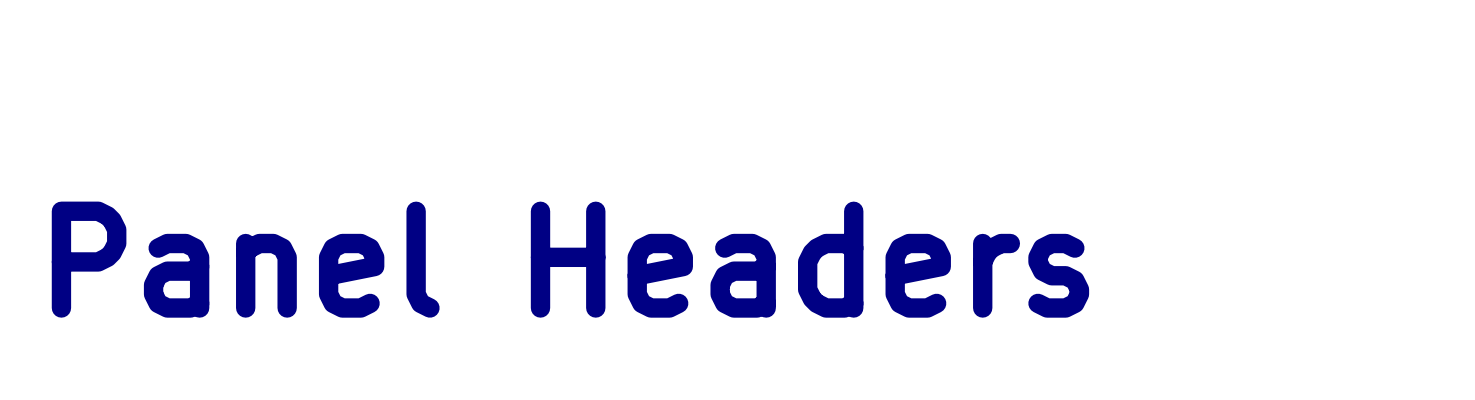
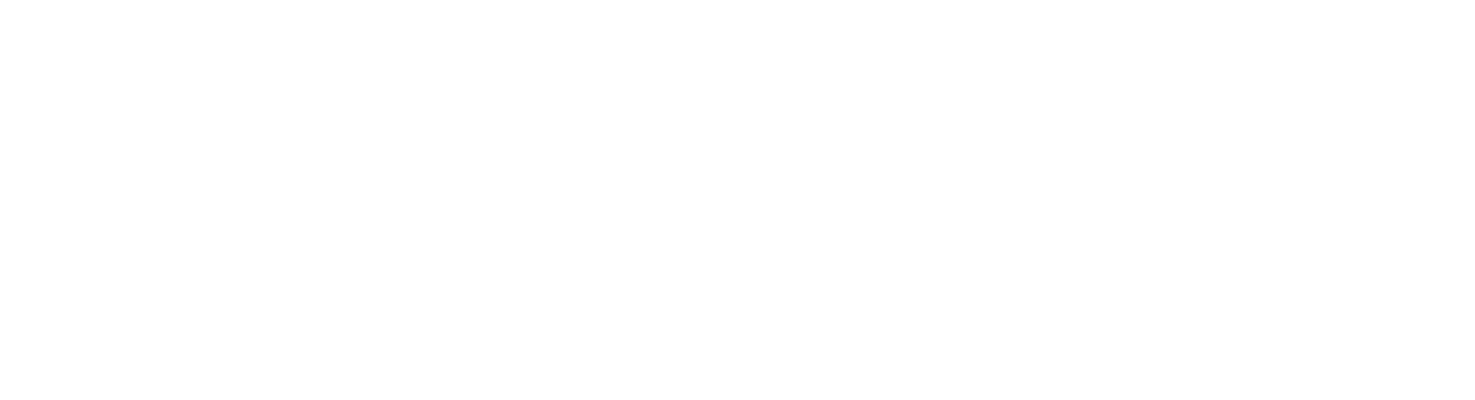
text: Panel Headers (570, 259) -> none

